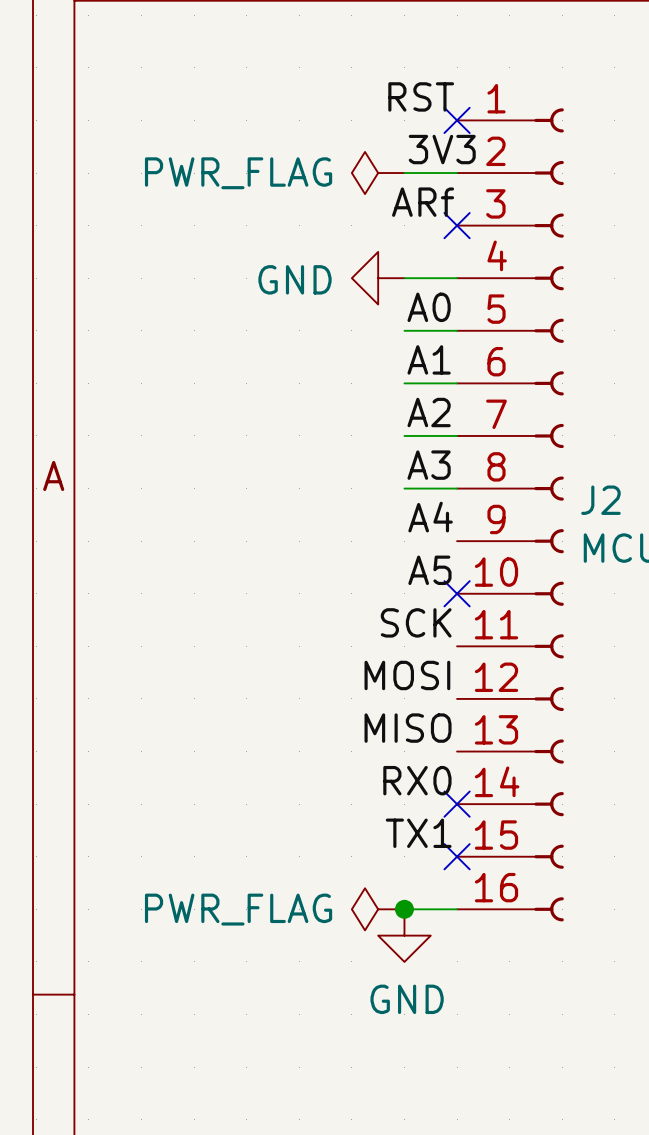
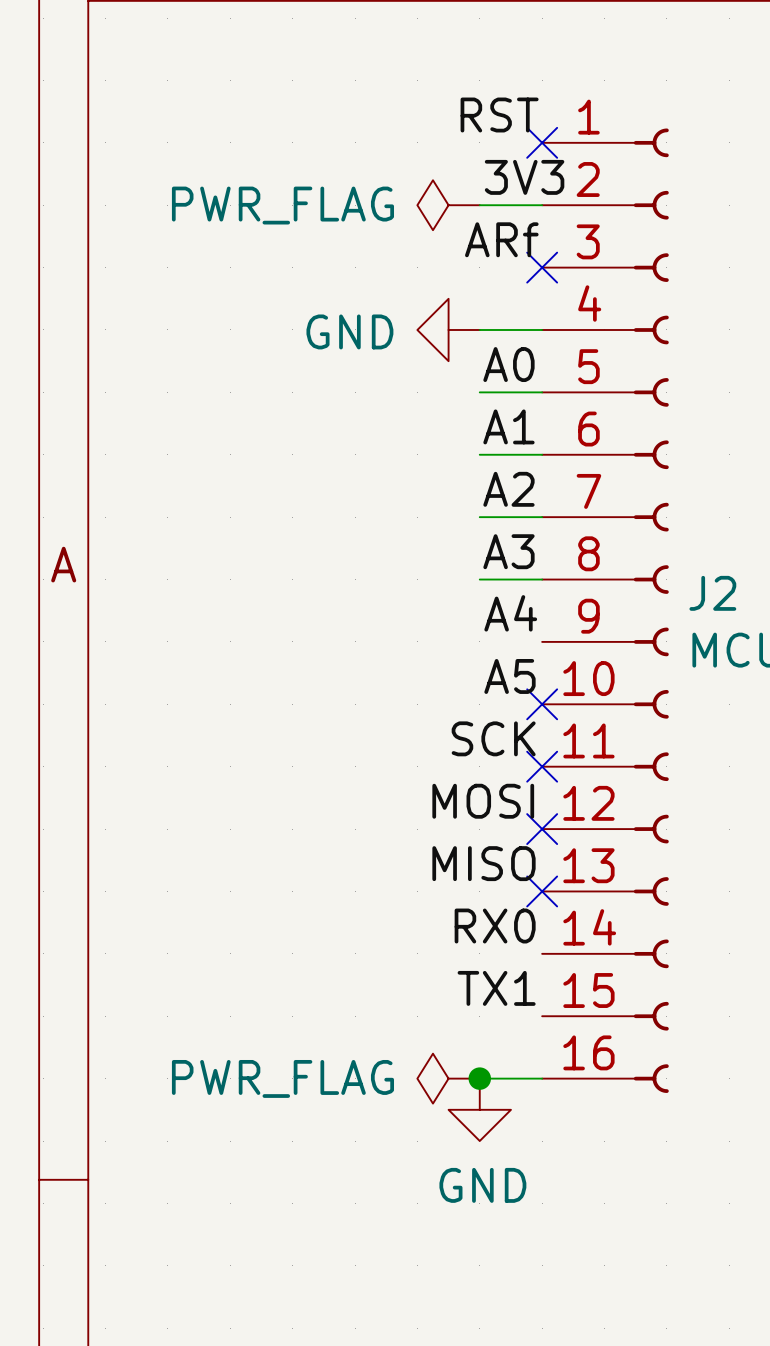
no-connect mark: none -> (542, 766)
no-connect mark: none -> (542, 829)
no-connect mark: none -> (542, 891)
no-connect mark: (457, 804) -> none
no-connect mark: (457, 856) -> none

